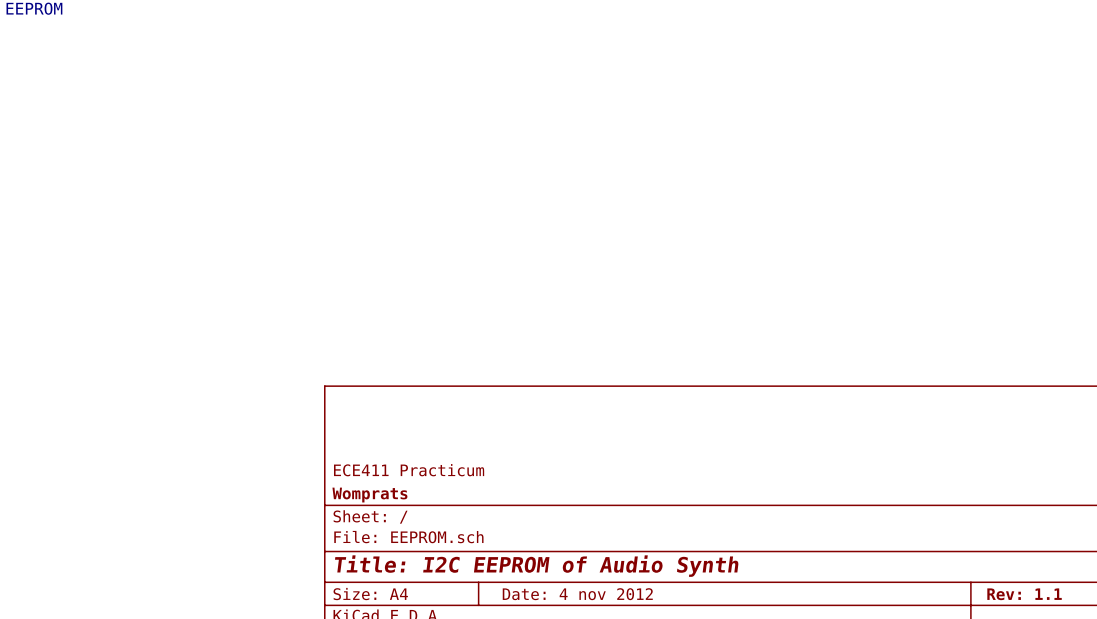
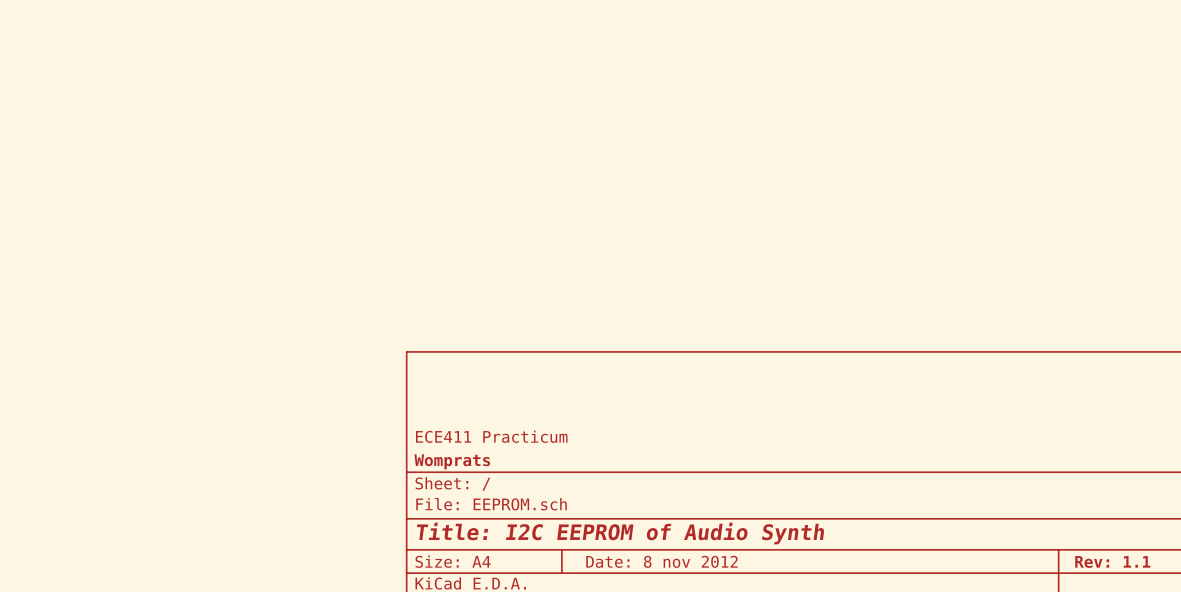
title block: Date: 4 nov 2012 (577, 594) -> Date: 8 nov 2012 (661, 561)

